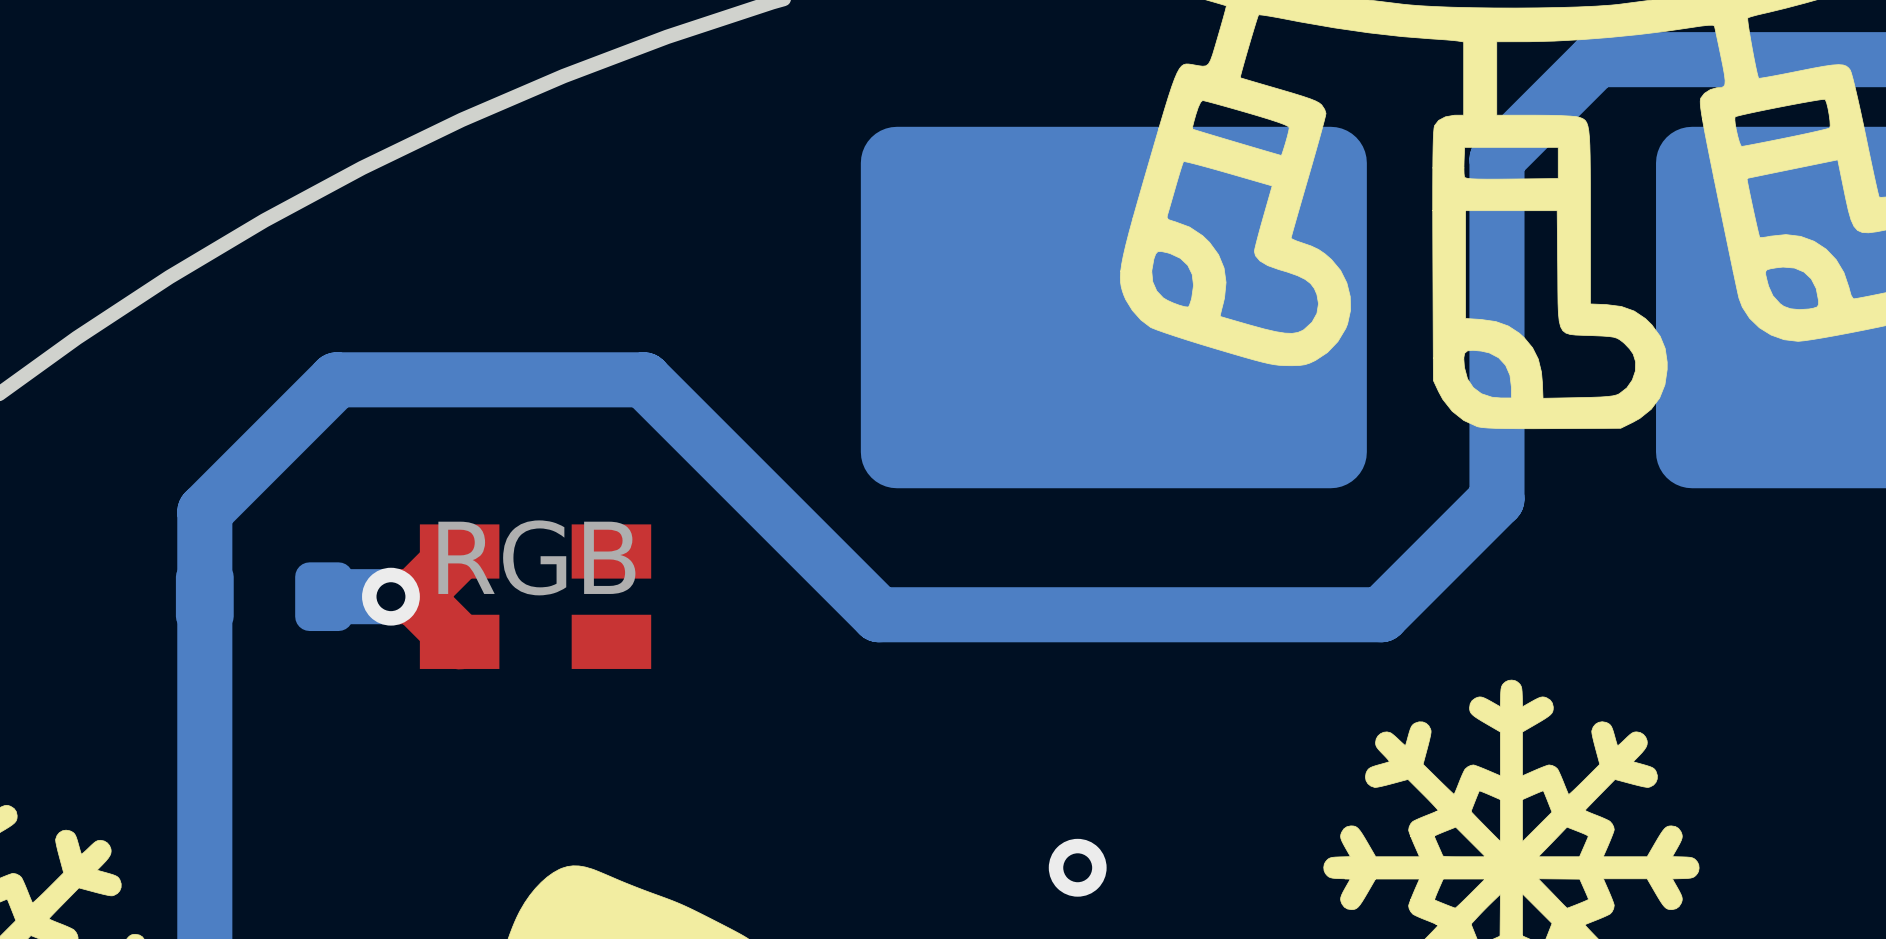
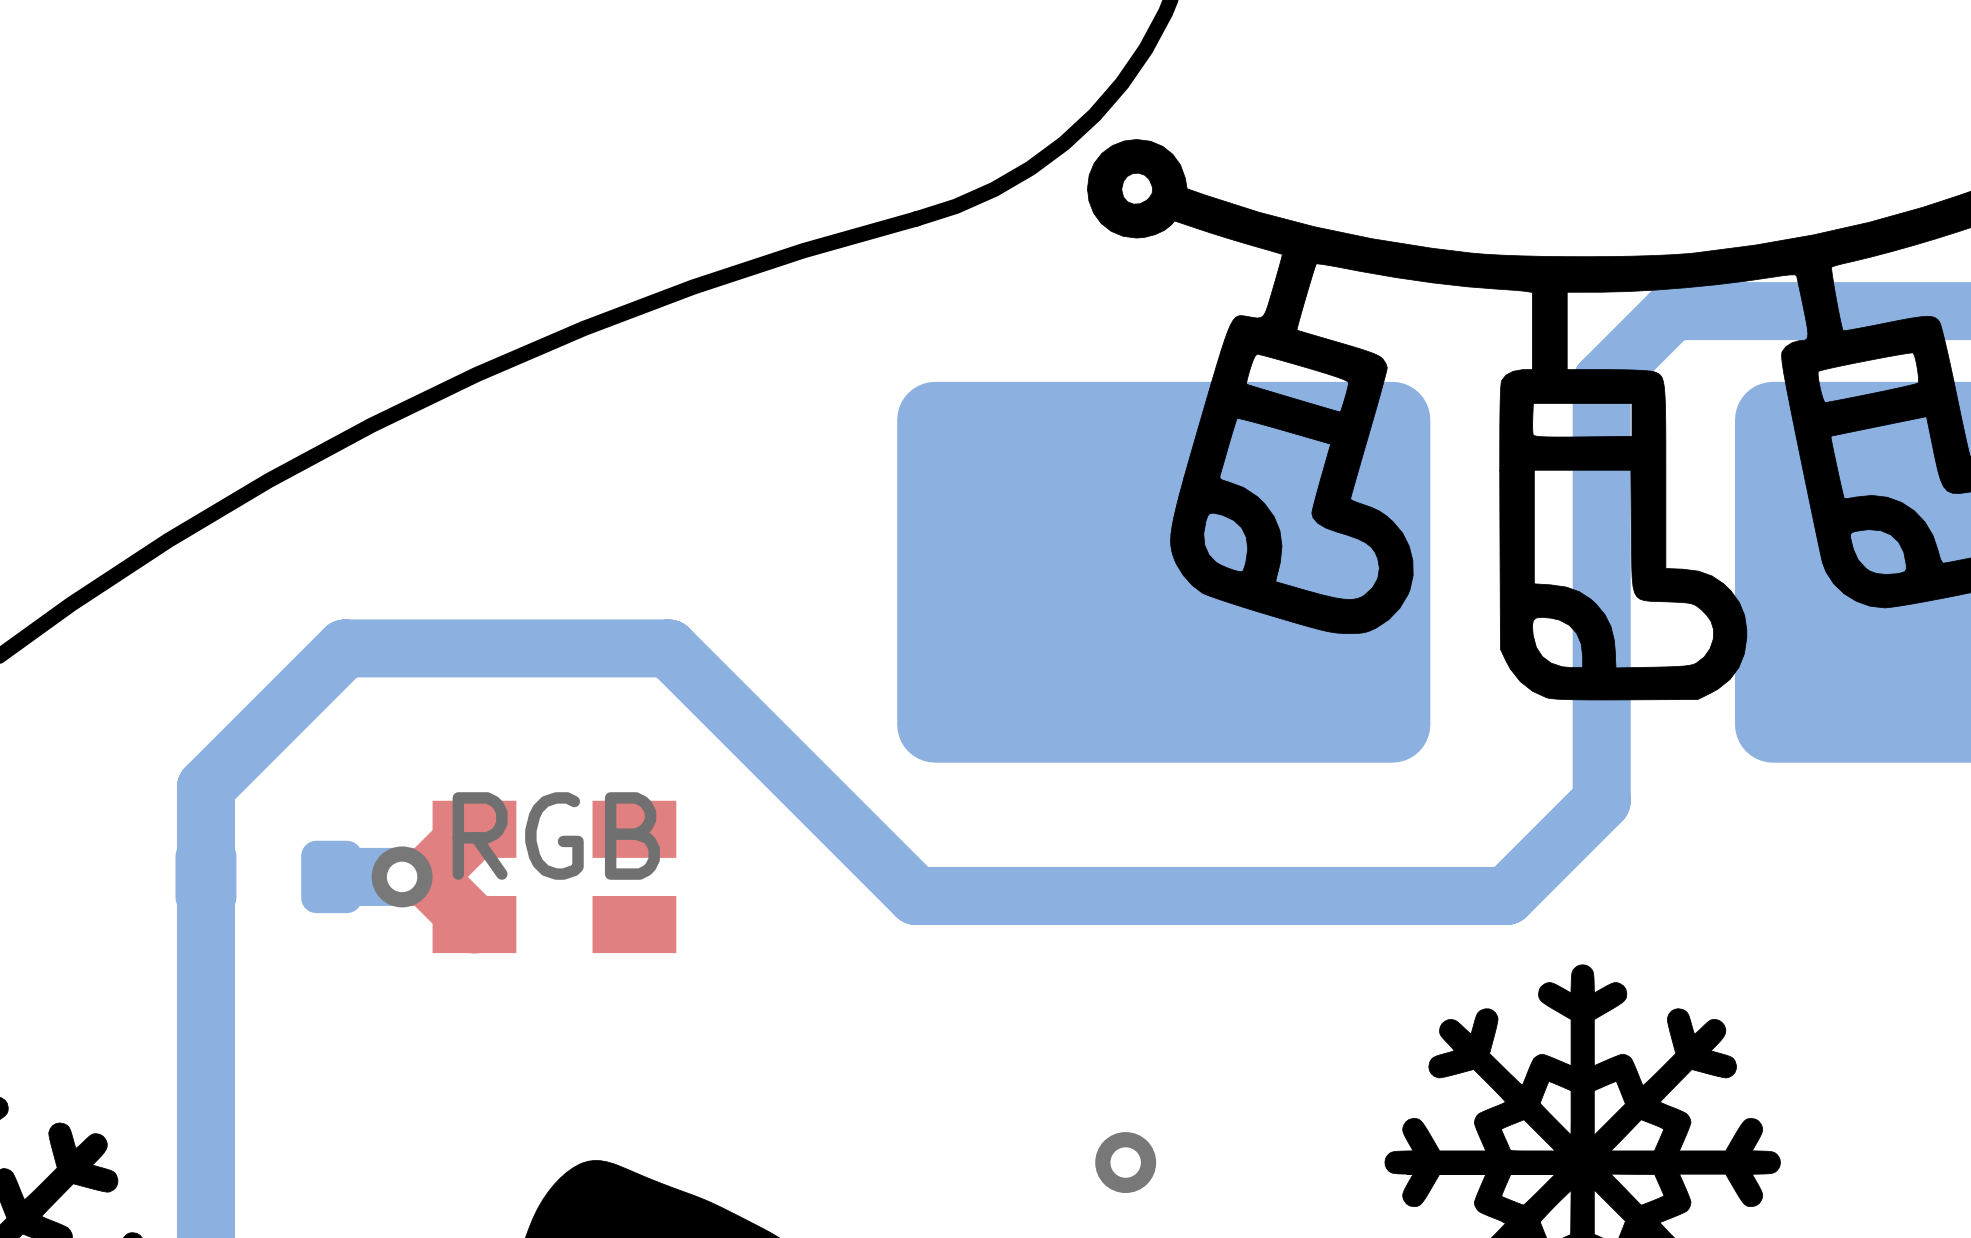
bottom track: (1529, 126) (1496, 159) (1496, 499) (1381, 614) -> (1601, 381) (1601, 800) (1506, 895) (1445, 895)

